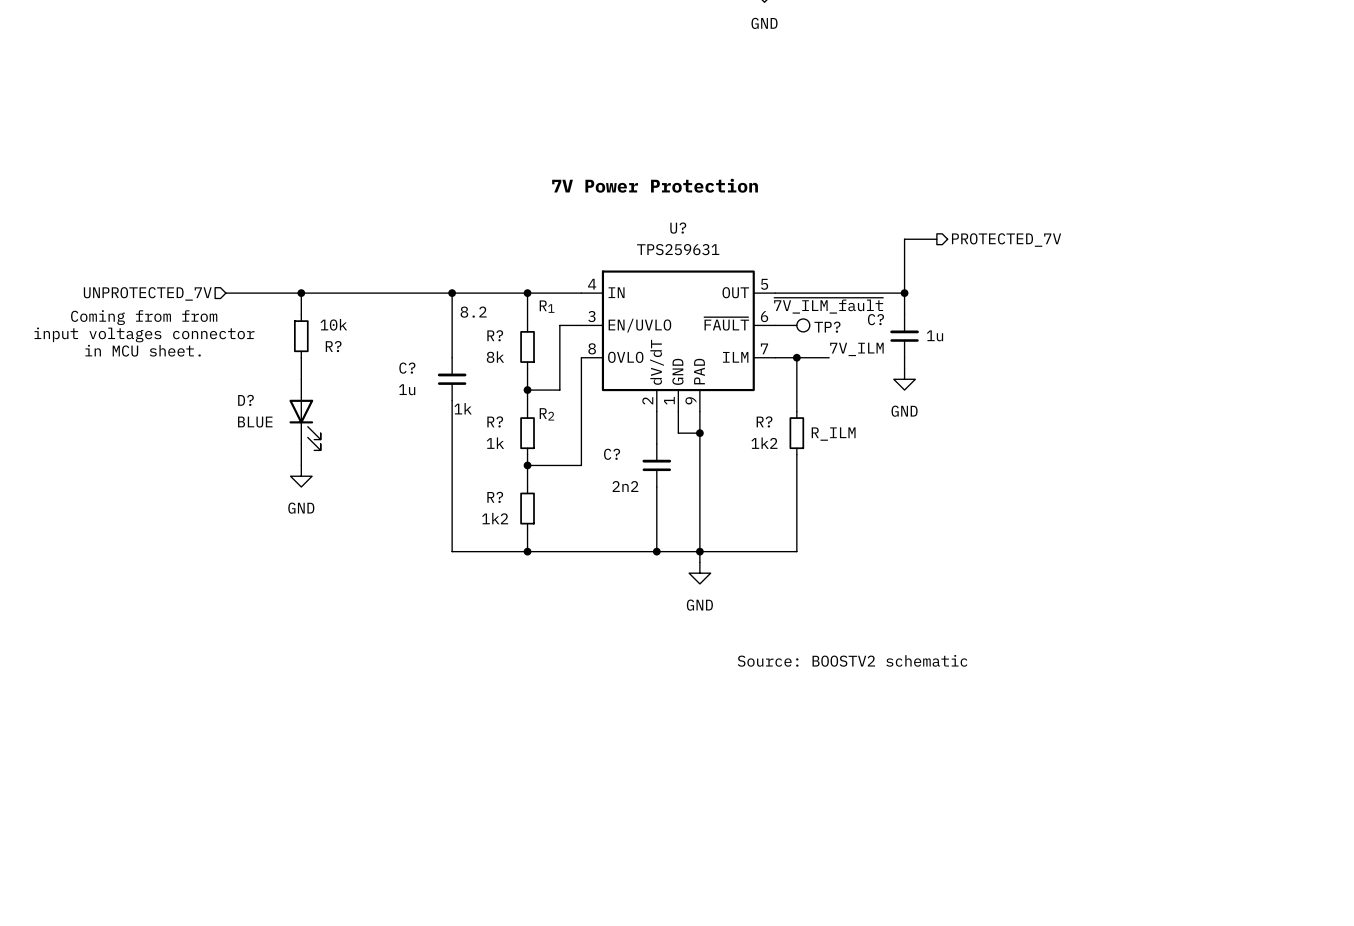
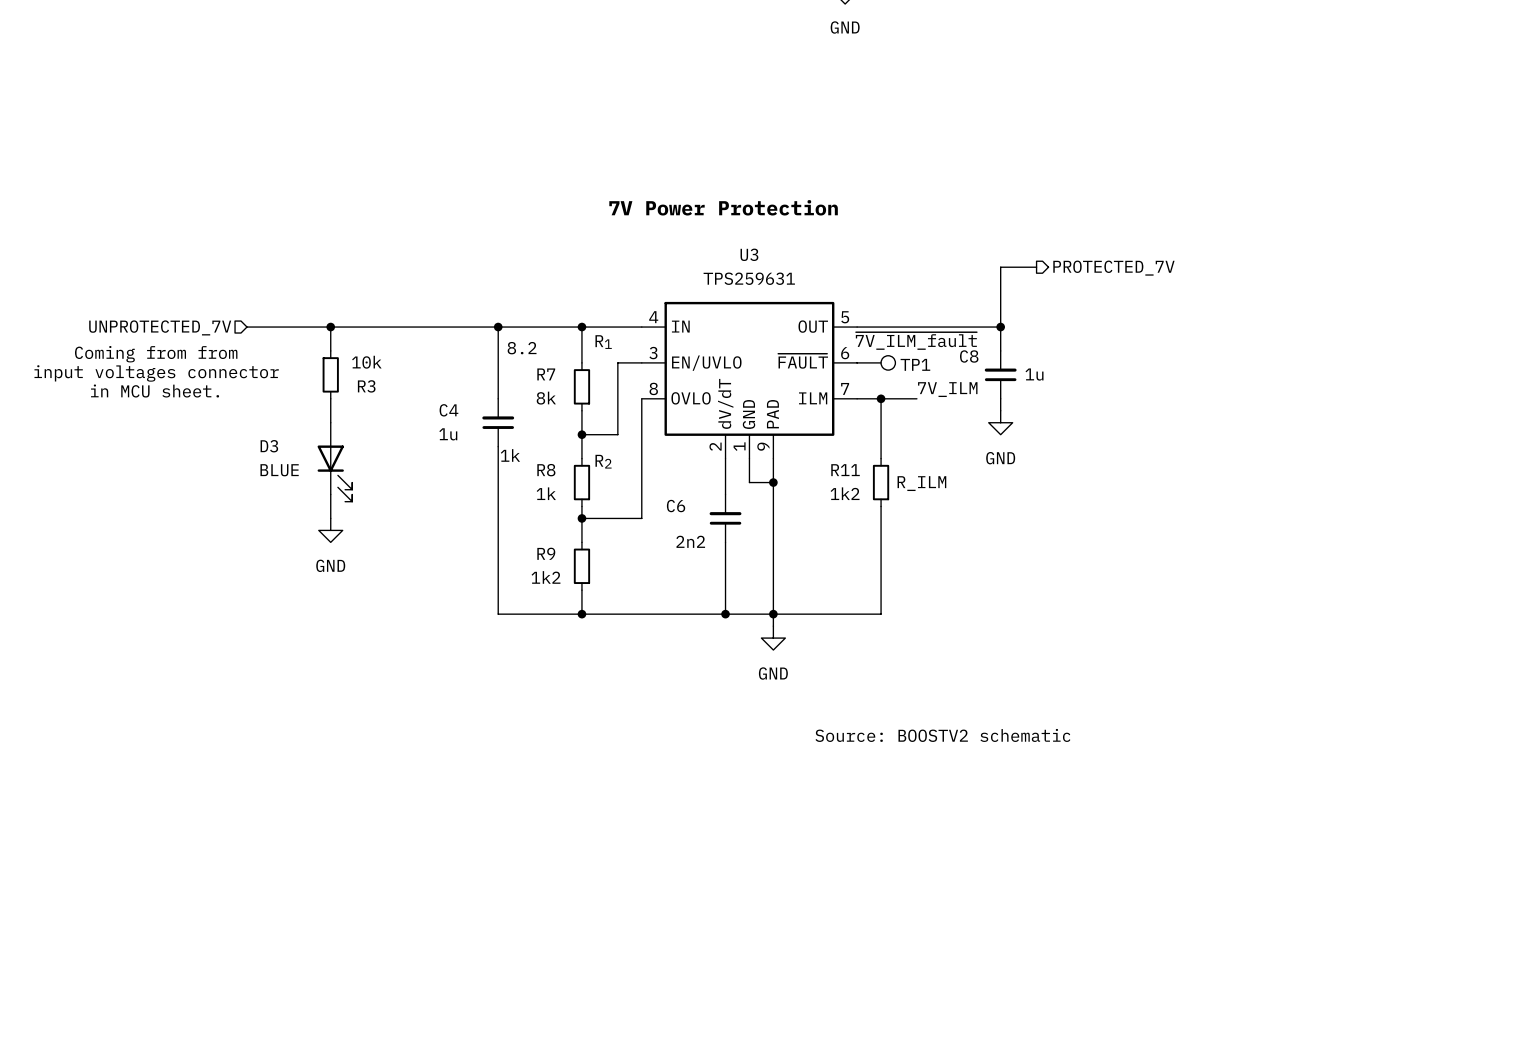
U? name: U? (678, 228) -> U3 (749, 254)
C? name: C? (875, 319) -> C8 (969, 356)
TP? name: TP? (827, 327) -> TP1 (915, 364)
R? name: R? (495, 335) -> R7 (546, 374)
R? name: R? (333, 346) -> R3 (366, 386)
C? name: C? (407, 368) -> C4 (448, 410)
D? name: D? (245, 400) -> D3 (269, 446)
R? name: R? (495, 421) -> R8 (546, 470)
R? name: R? (764, 421) -> R11 (845, 470)
C? name: C? (612, 454) -> C6 (676, 506)
R? name: R? (495, 497) -> R9 (546, 553)

